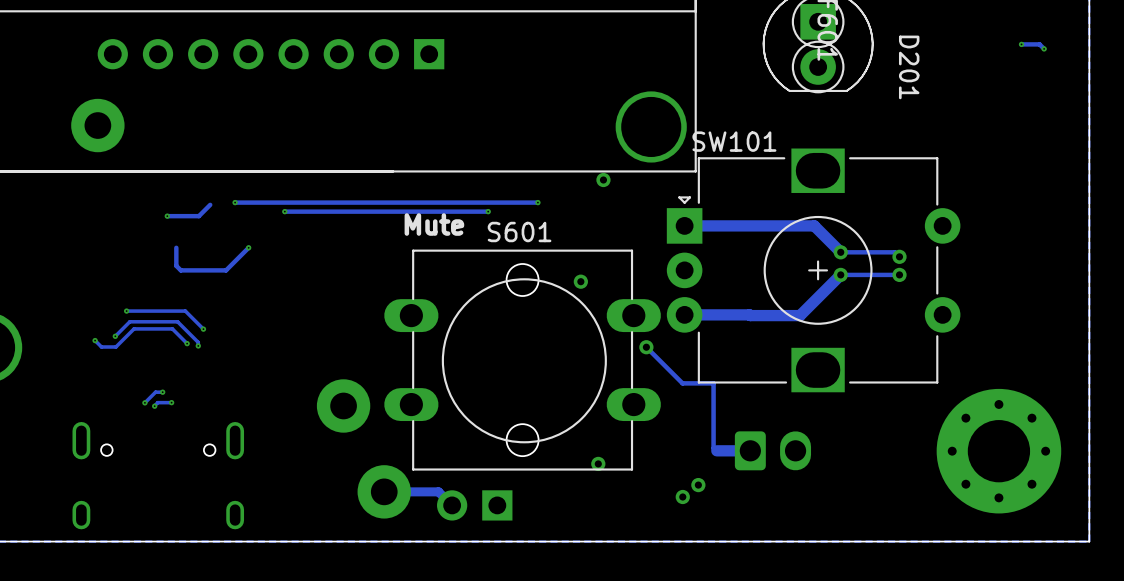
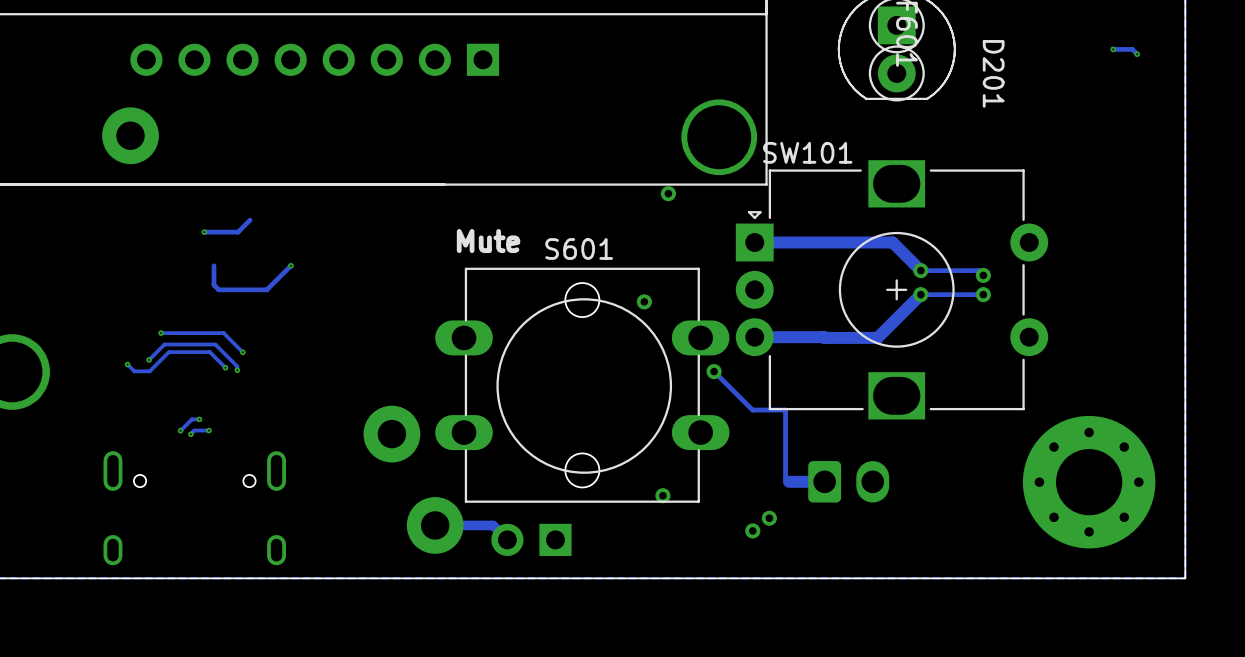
via: (235, 202) -> none
track: (537, 202) (235, 202) -> none
via: (537, 202) -> none
via: (284, 211) -> none
track: (488, 211) (284, 211) -> none
via: (488, 211) -> none

